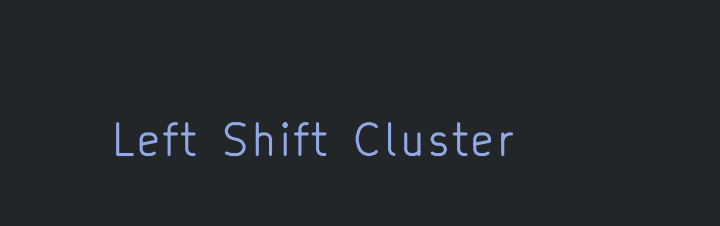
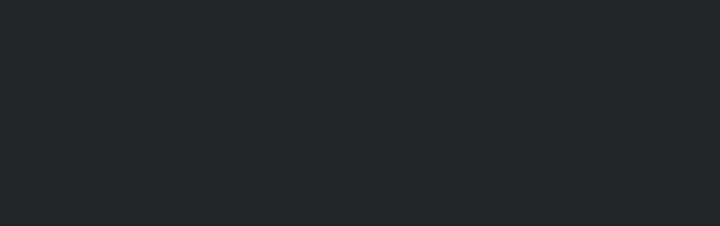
text: Left Shift Cluster (314, 139) -> none

